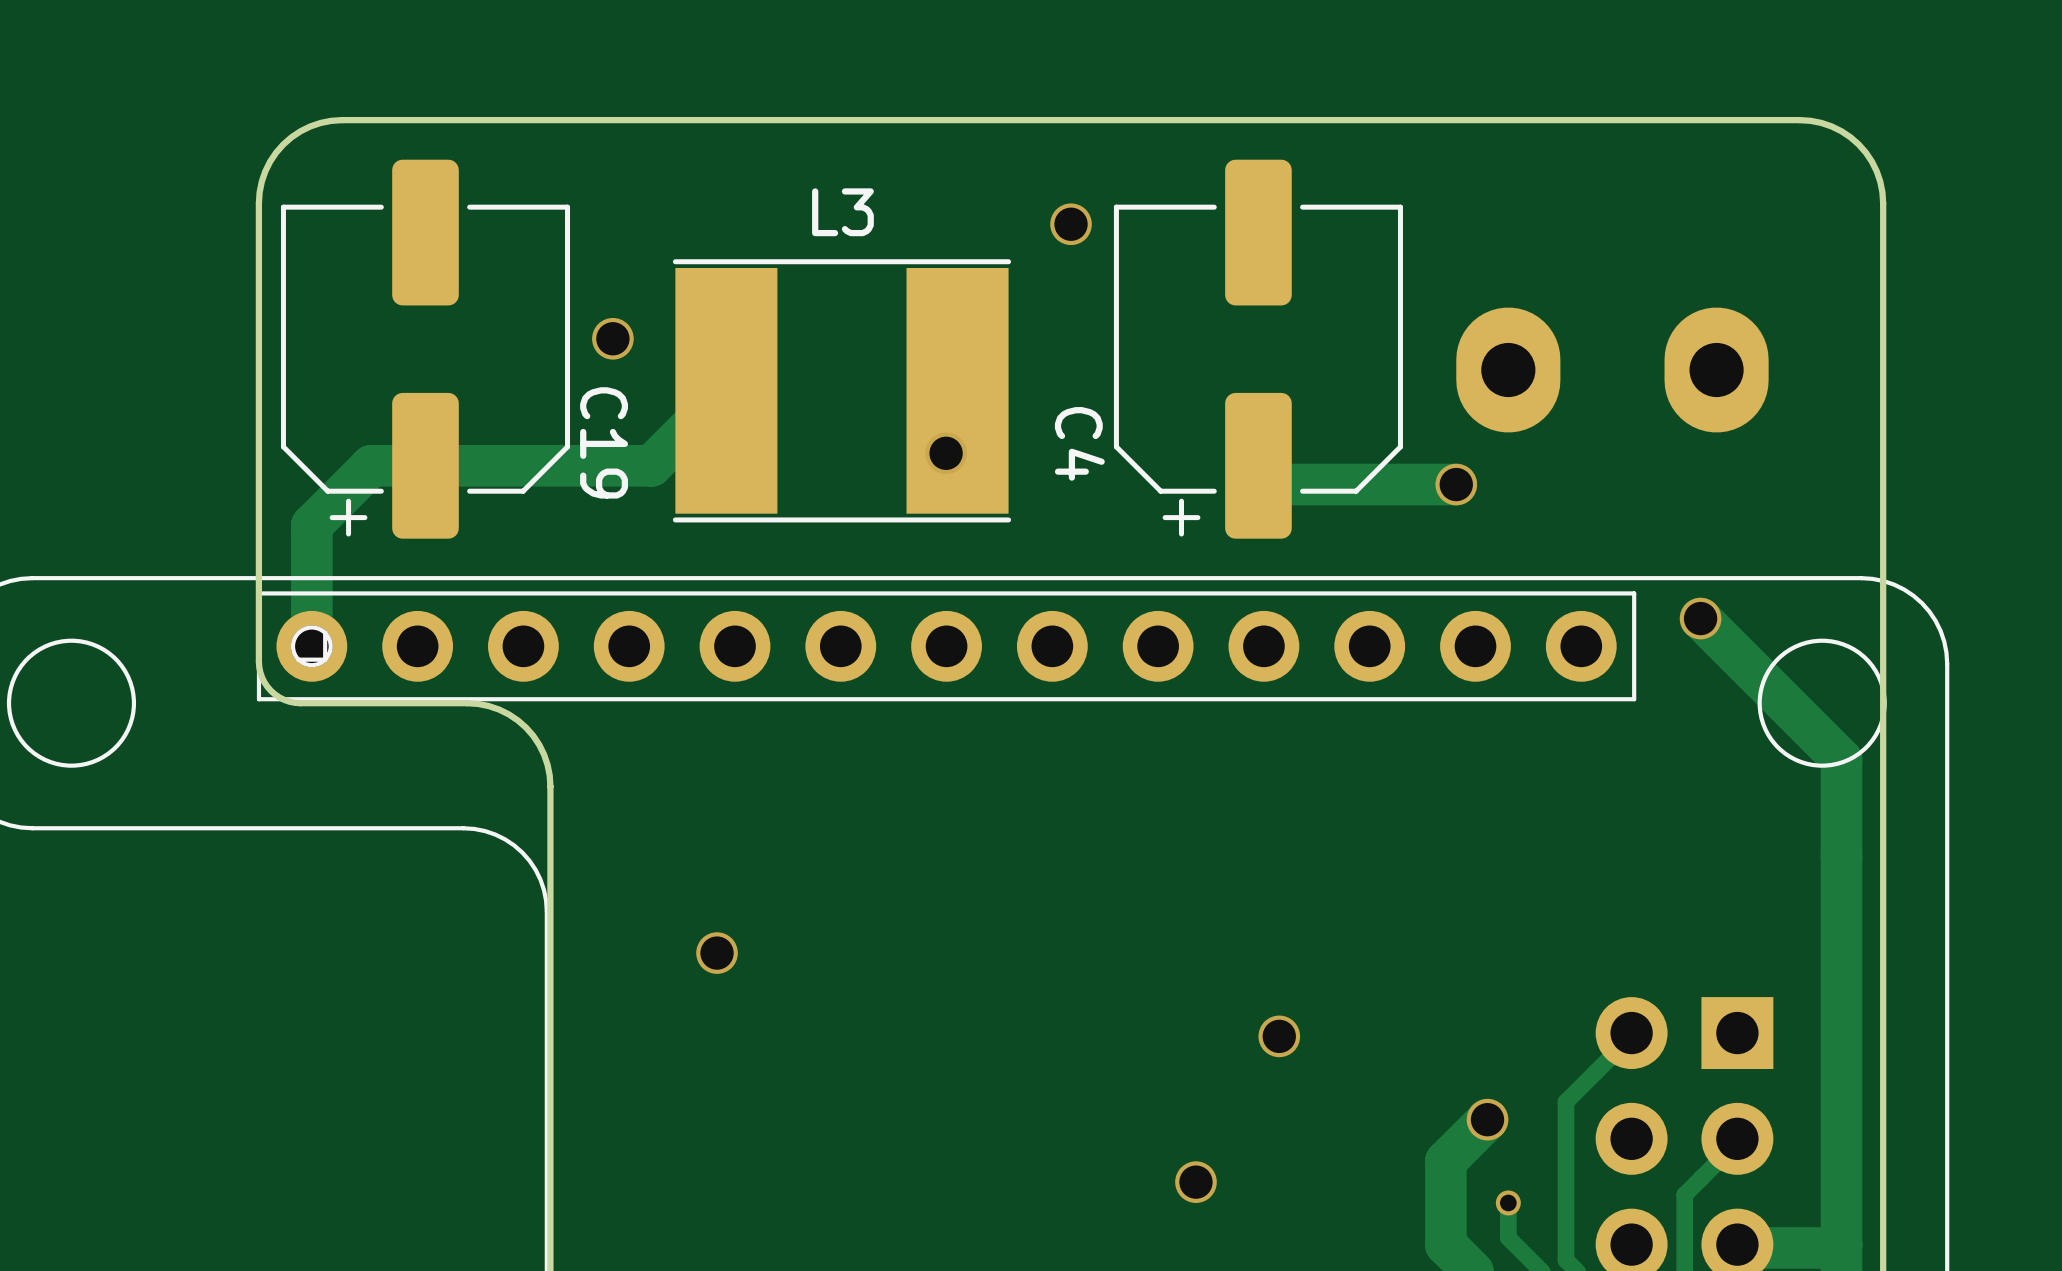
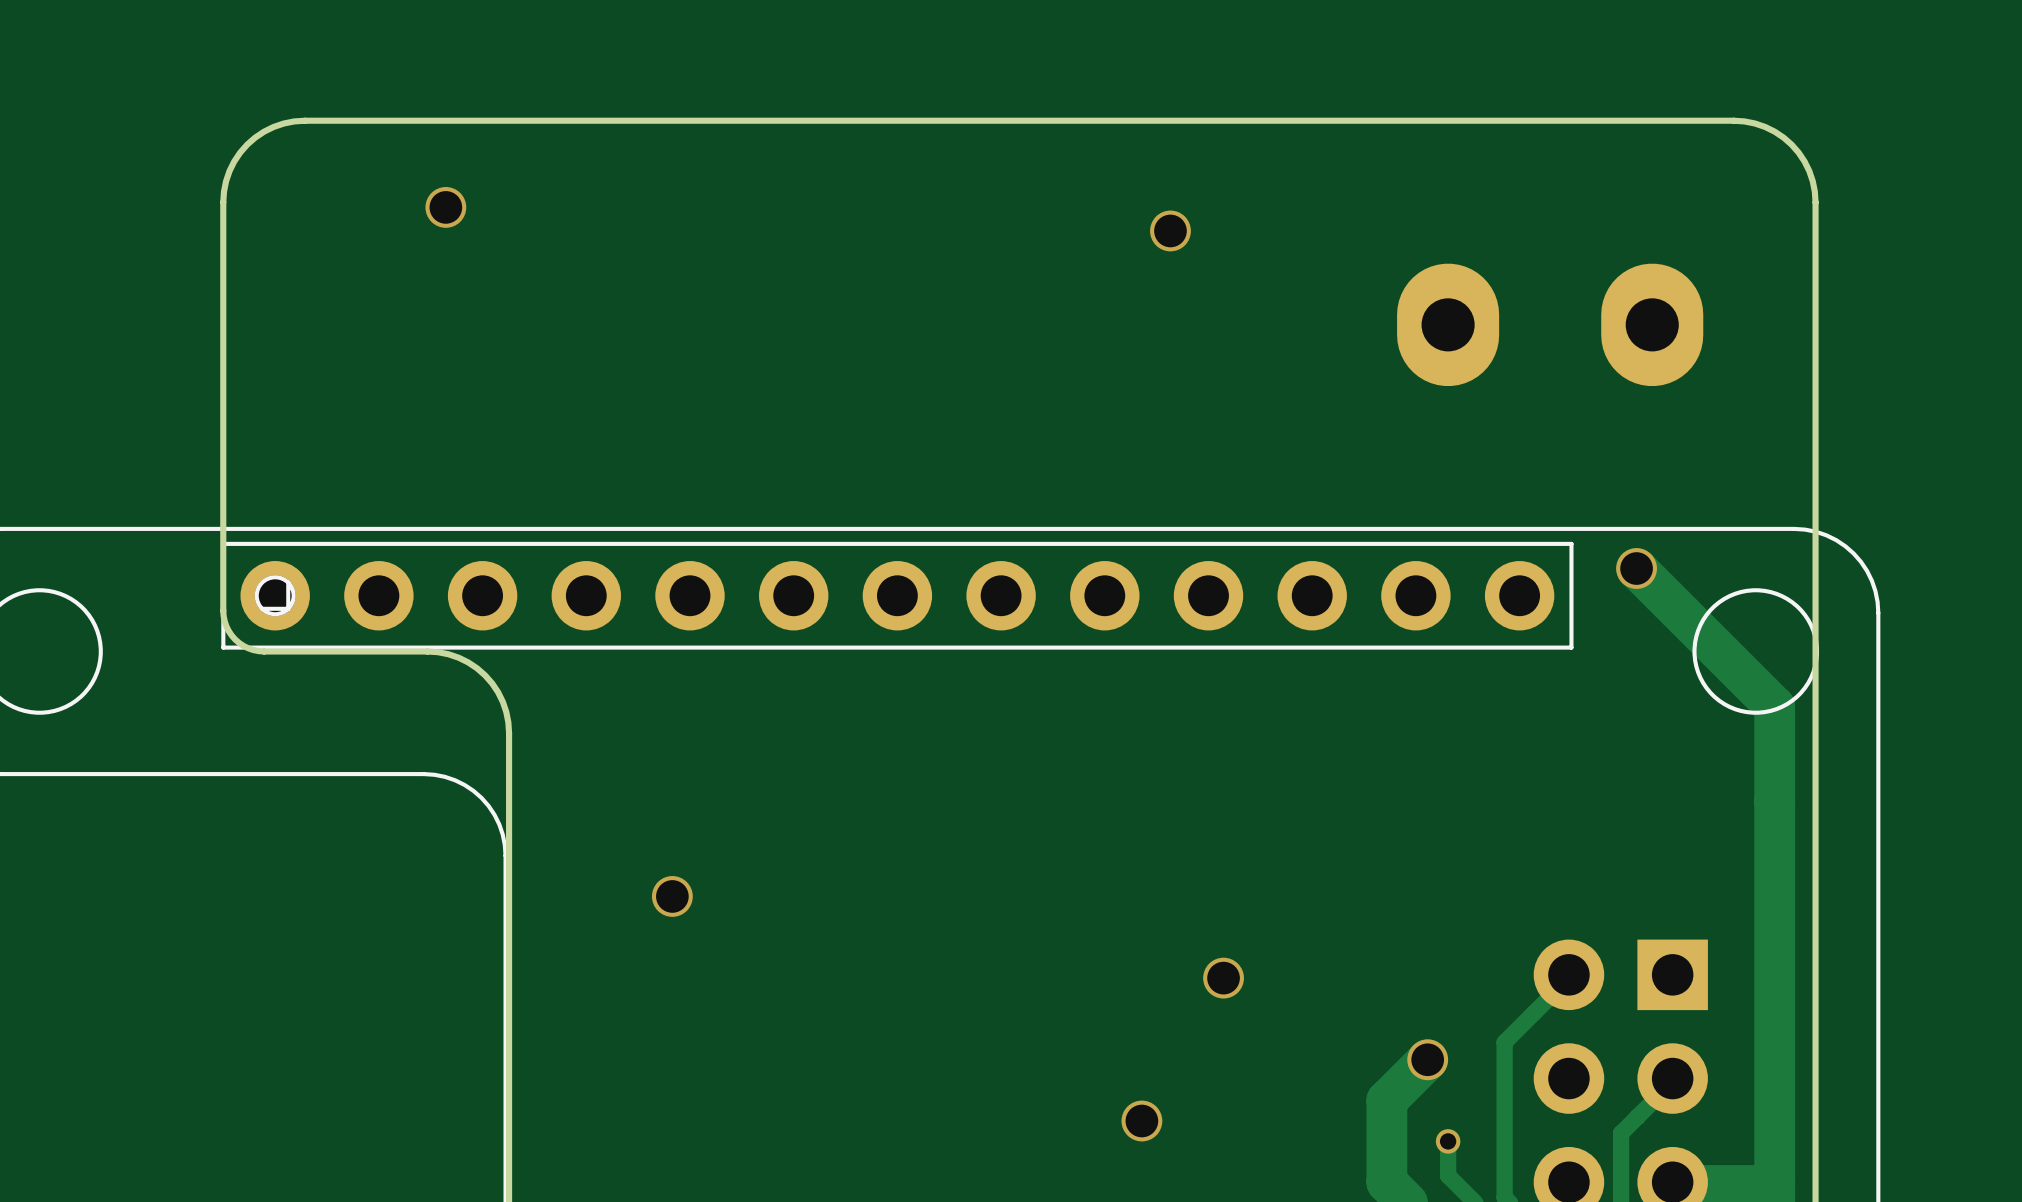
via: (1071, 224) -> none
board edge: (1883, 245) (1882, 192) (1872, 161) (1858, 144) (1841, 131) (1821, 122) (1799, 120) (331, 120) (310, 126) (291, 137) (270, 161) (259, 192) (258, 245) -> (1815, 202) (1809, 171) (1791, 144) (1765, 126) (1733, 120) (304, 120) (273, 126) (247, 144) (229, 171) (223, 202)
via: none -> (1170, 230)
via position: (612, 338) -> (445, 207)
C19: (425, 349) -> none
C4: (1258, 349) -> none
track: (726, 390) (651, 465) (371, 465) (311, 525) (311, 646) -> none
L3: (841, 390) -> none
via: (946, 453) -> none
track: (1456, 484) (1260, 484) (1258, 486) -> none
via: (1456, 484) -> none

